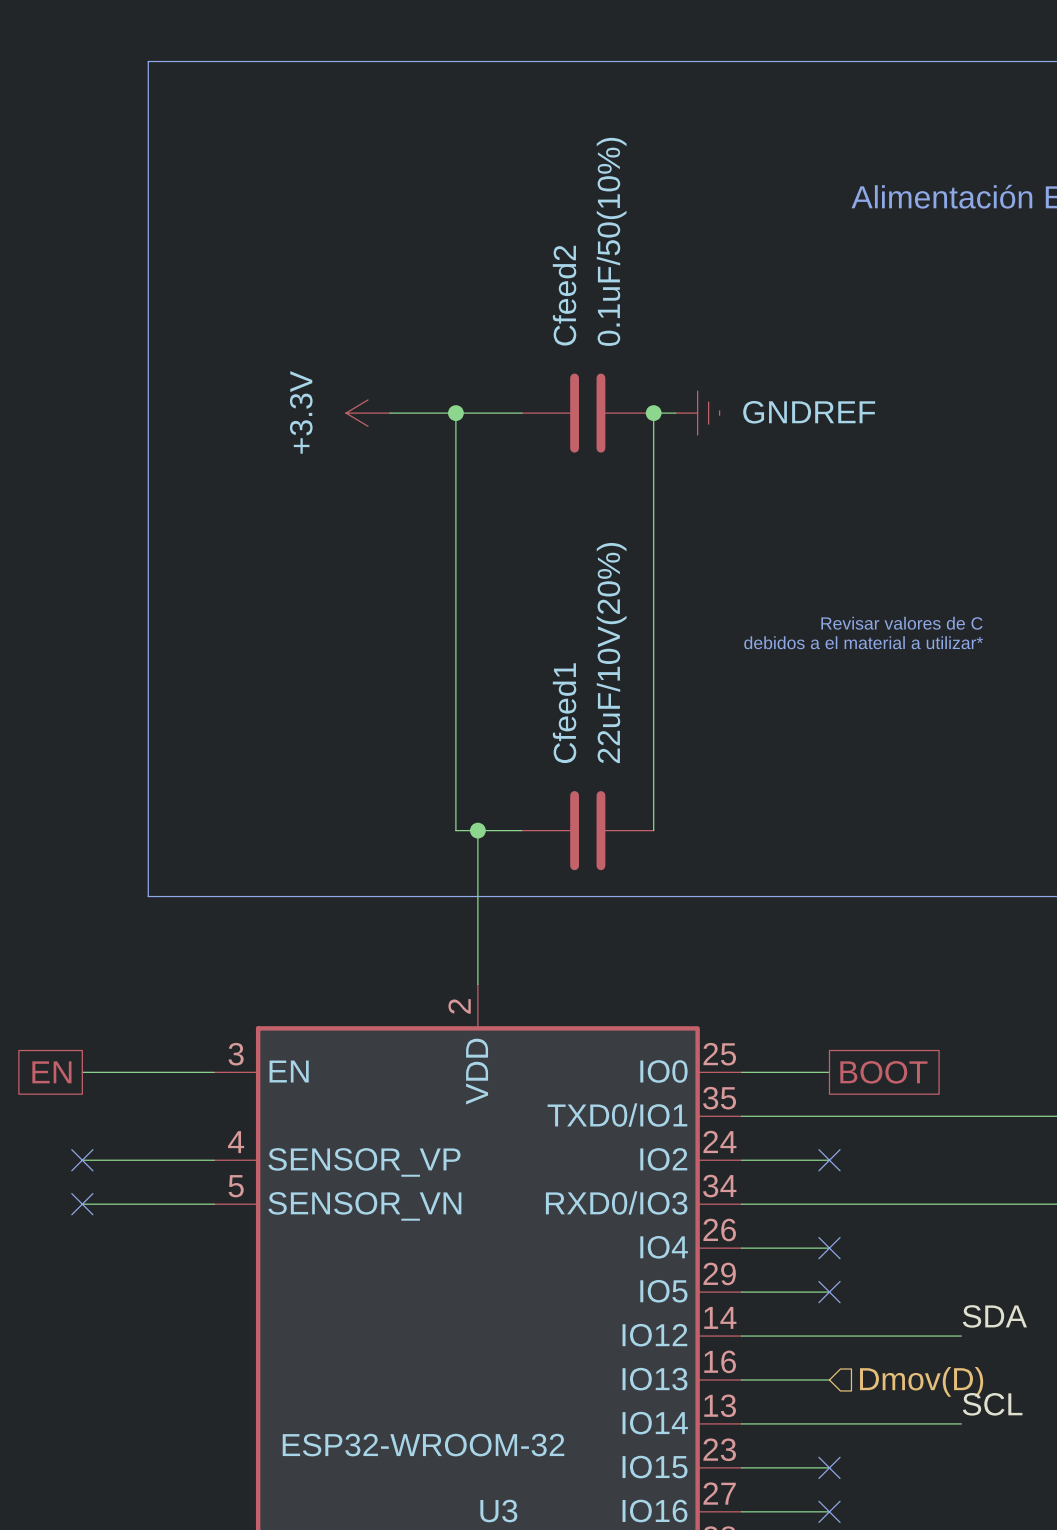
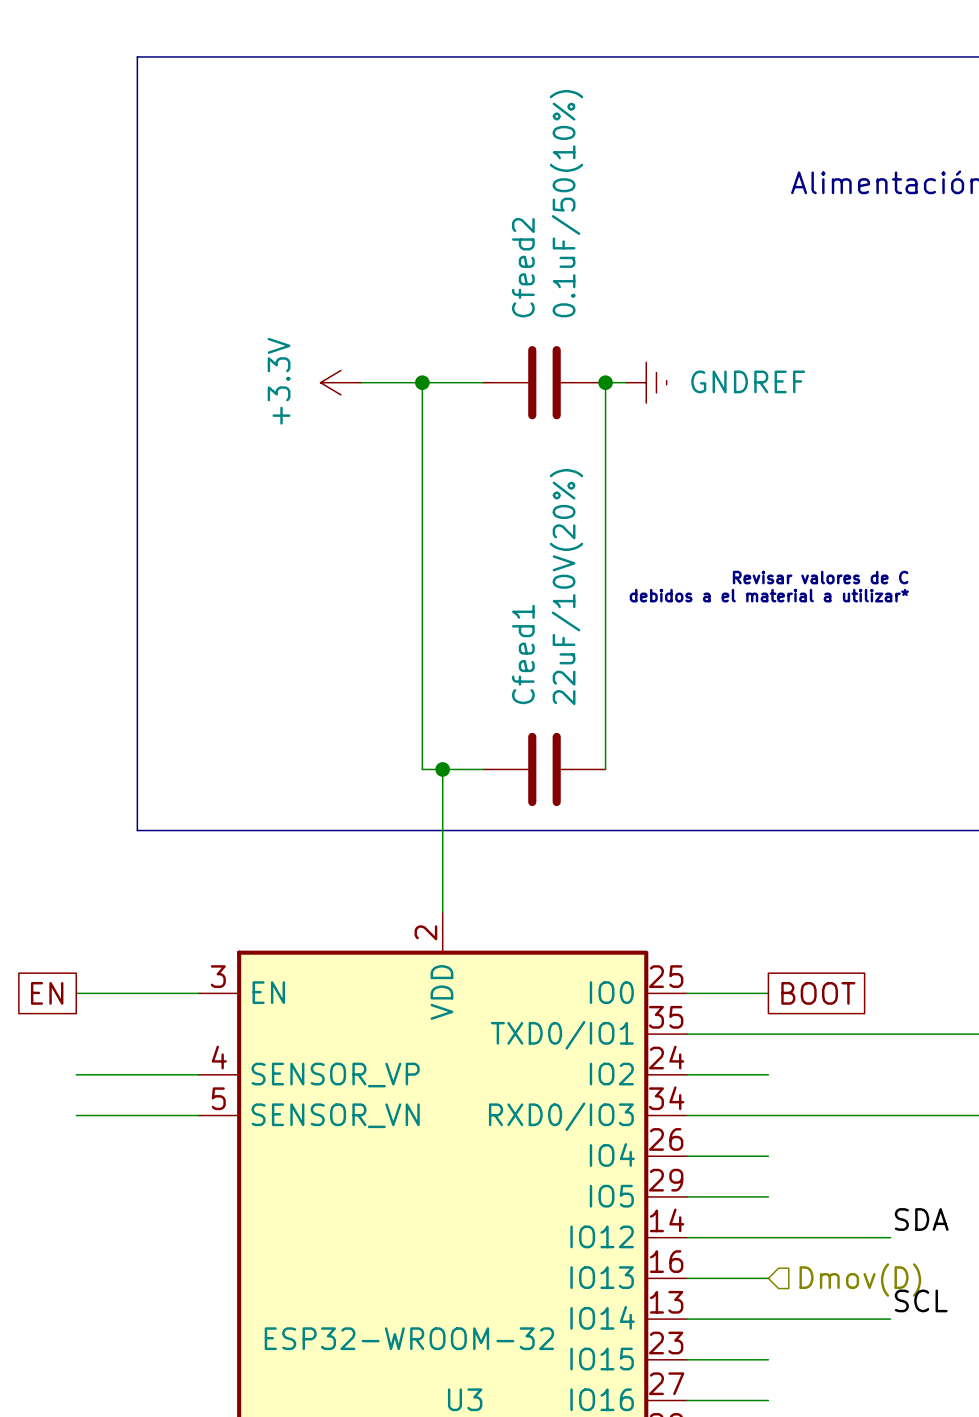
no-connect mark: (82, 1160) -> none
no-connect mark: (829, 1160) -> none
no-connect mark: (82, 1204) -> none
no-connect mark: (829, 1248) -> none
no-connect mark: (829, 1292) -> none
no-connect mark: (829, 1467) -> none
no-connect mark: (829, 1511) -> none

